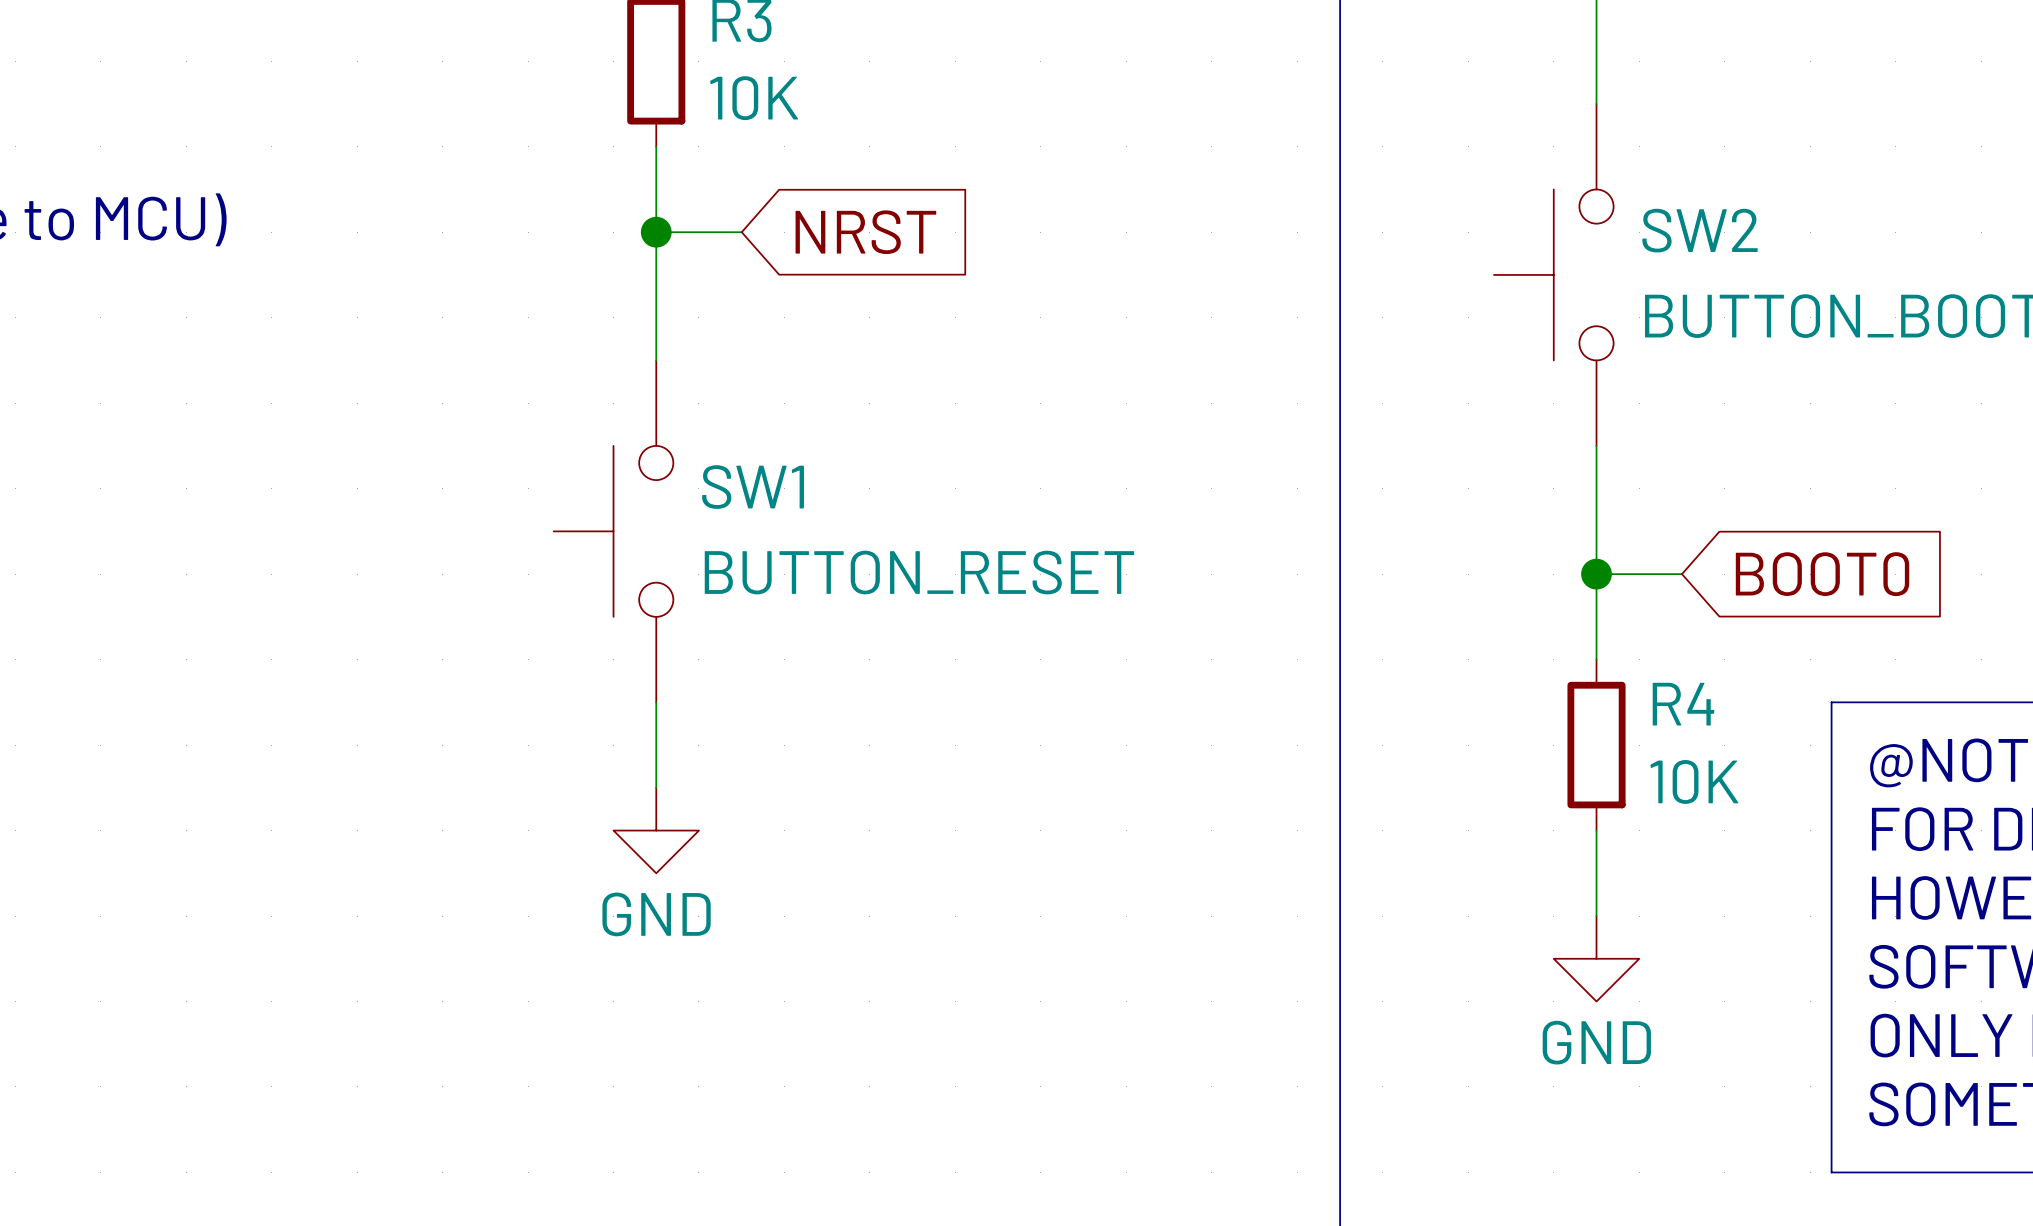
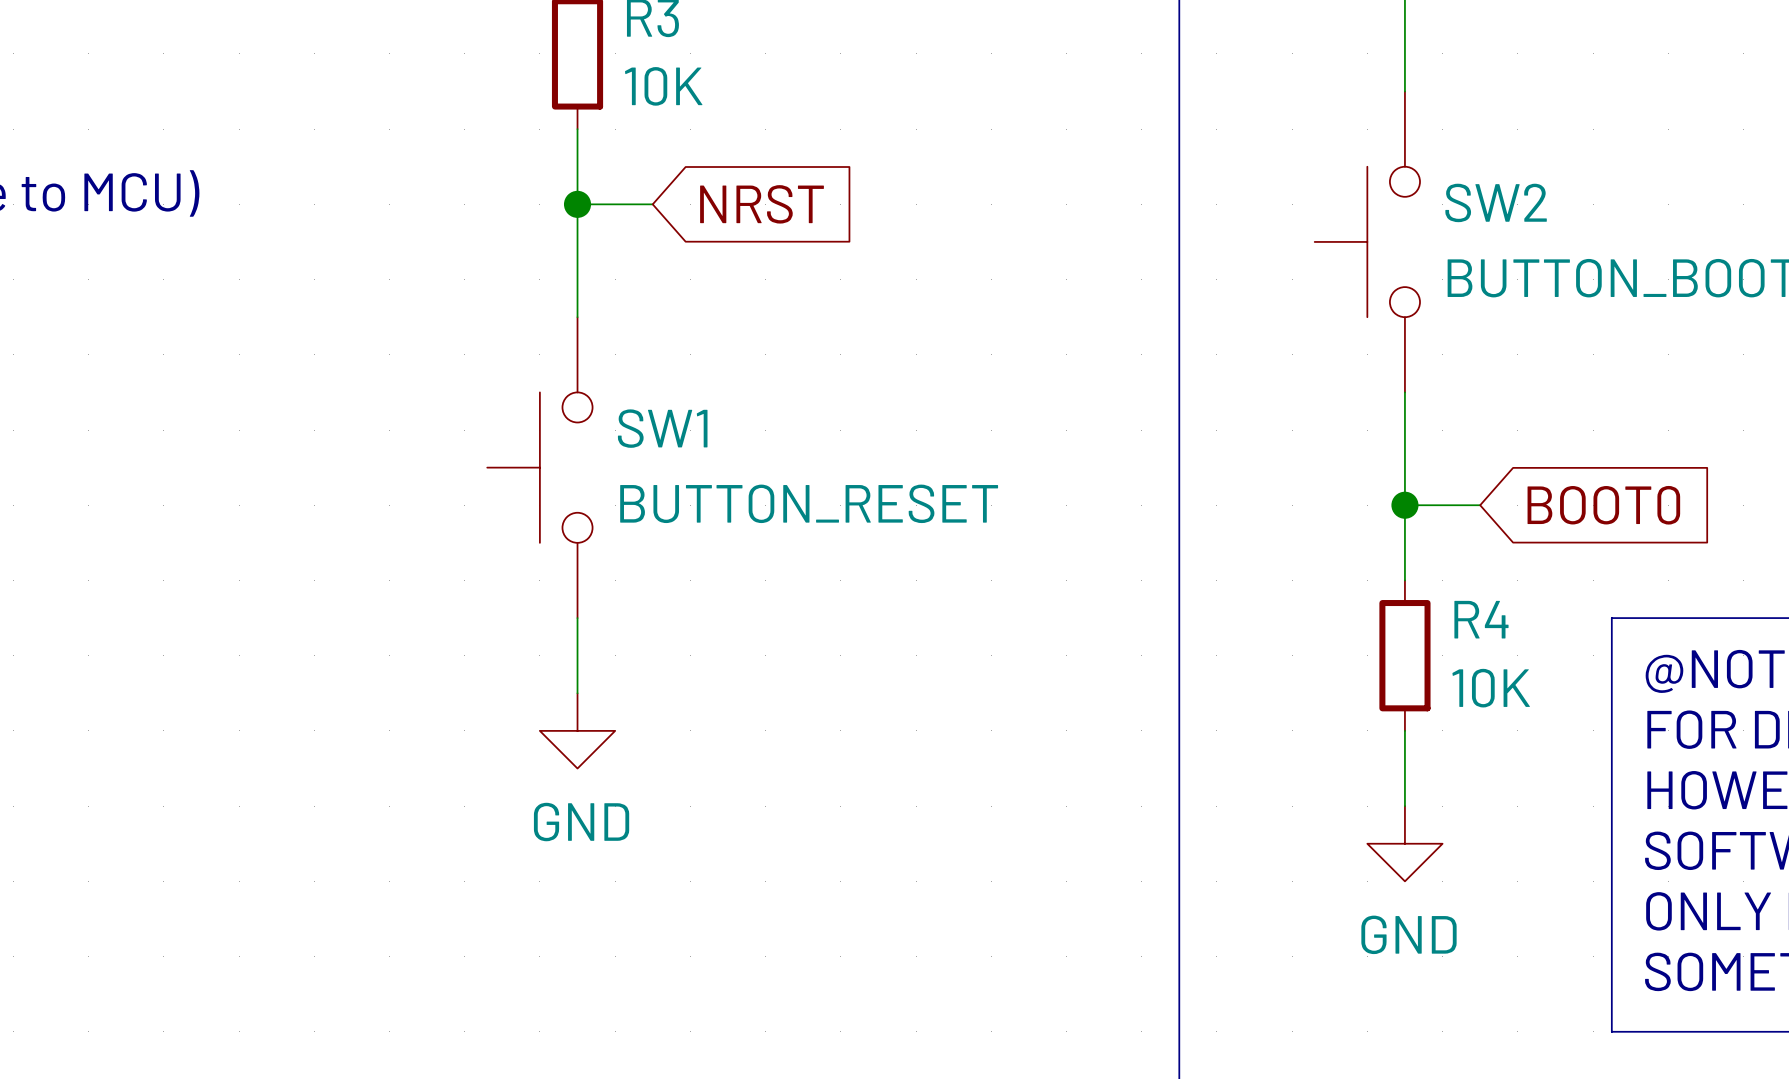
power symbol text position: GND (656, 914) -> GND (581, 822)
power symbol text position: GND (1596, 1042) -> GND (1408, 934)

